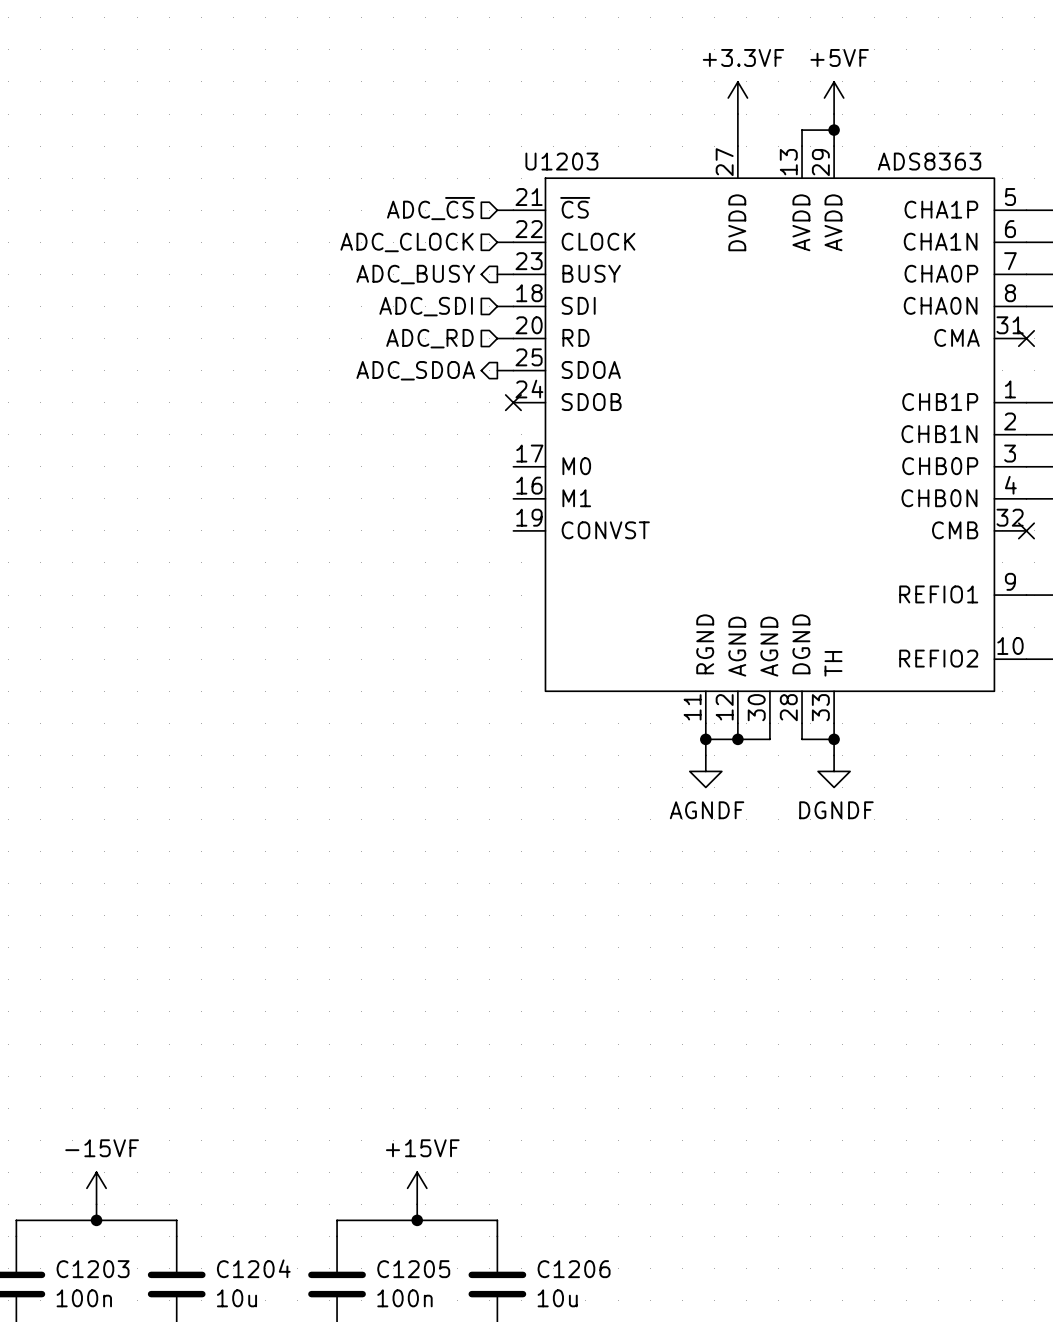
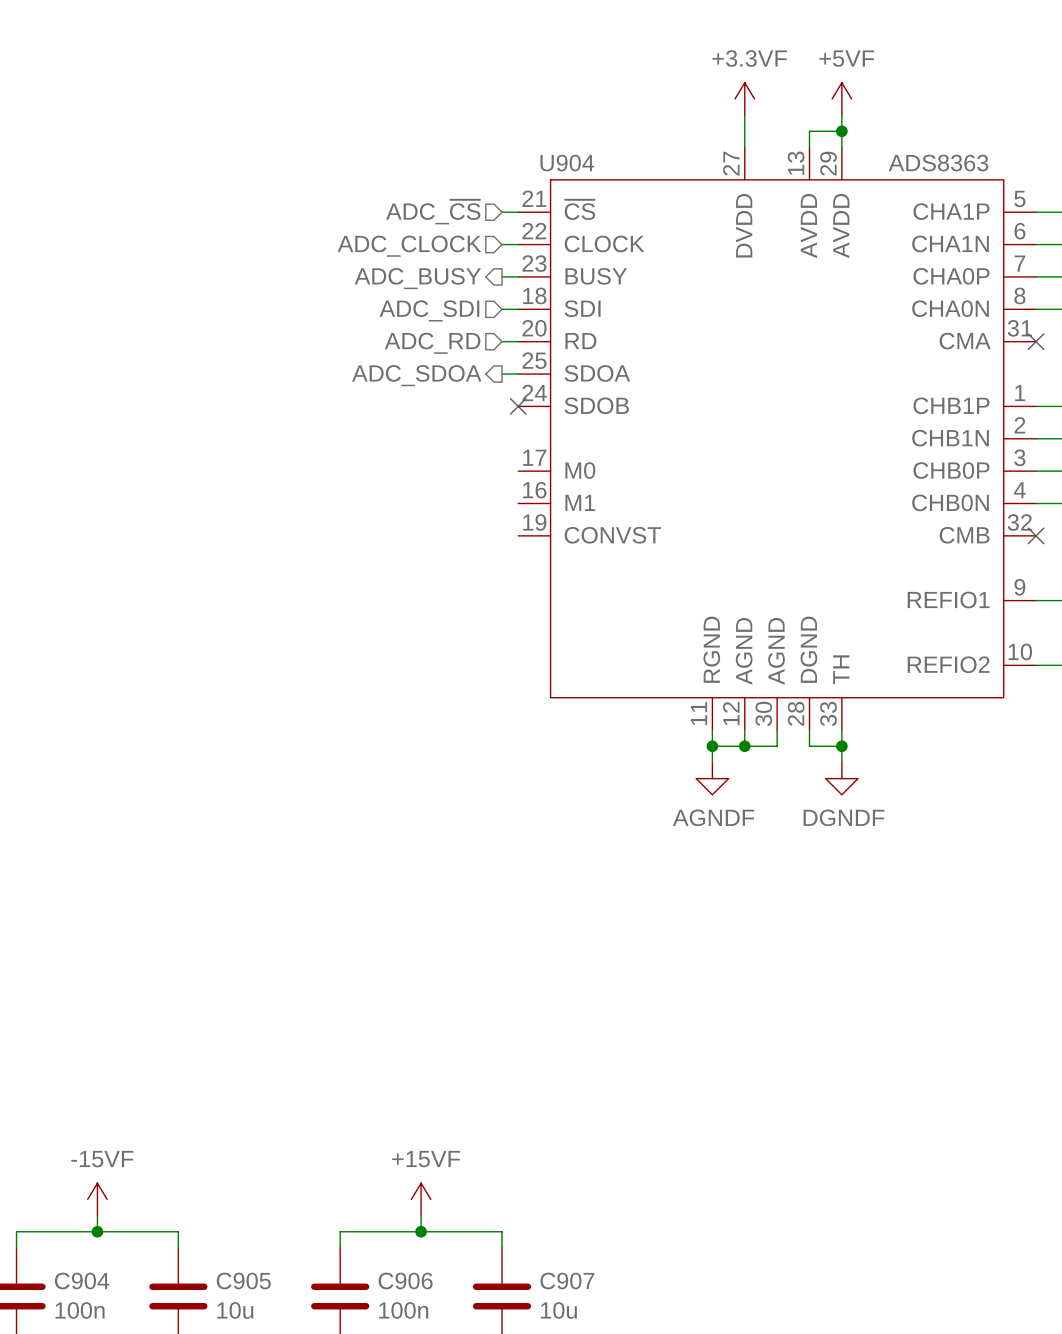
U1203 name: U1203 (561, 161) -> U904 (567, 163)
C1204 name: C1204 (253, 1268) -> C905 (243, 1281)
C1203 name: C1203 (93, 1269) -> C904 (82, 1281)
C1205 name: C1205 (413, 1269) -> C906 (405, 1281)
C1206 name: C1206 (574, 1269) -> C907 (567, 1281)

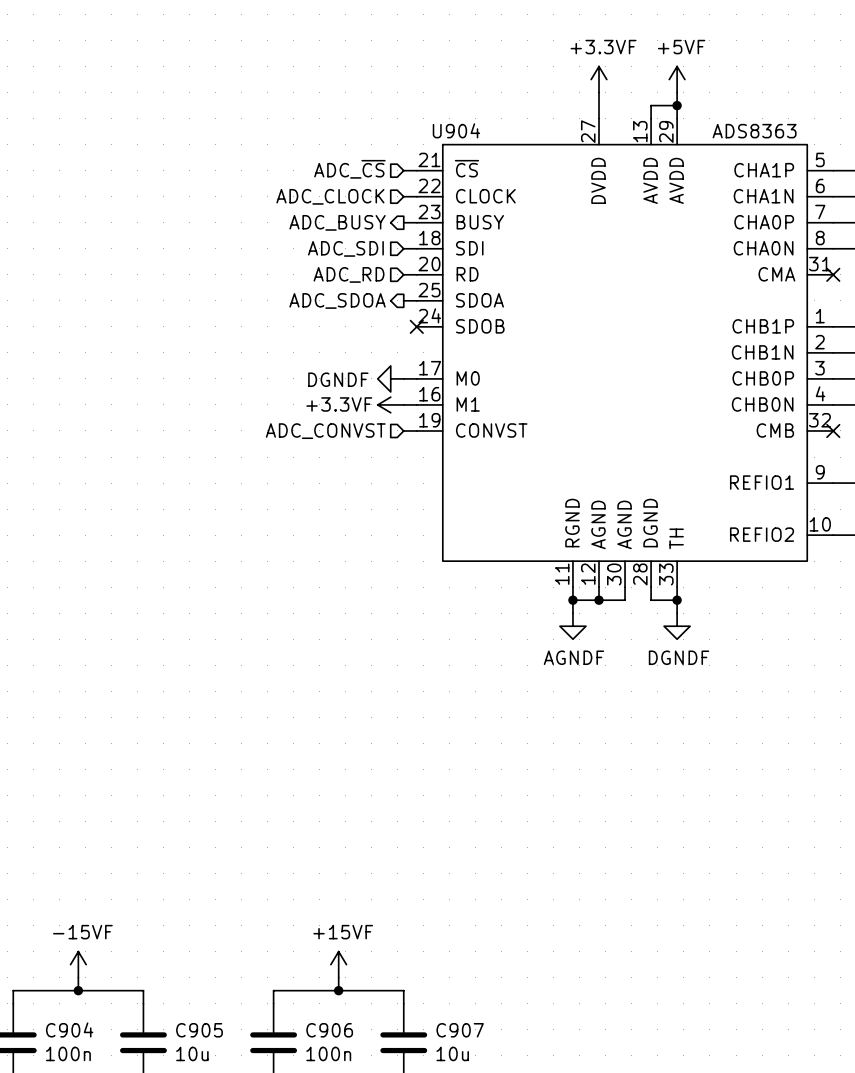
power symbol: none -> DGNDF (390, 378)
wire: none -> (403, 378) (416, 378)
power symbol: none -> +3.3VF (390, 404)
wire: none -> (403, 404) (416, 404)
wire: none -> (403, 430) (416, 430)
hierarchical label: none -> ADC_CONVST (325, 431)

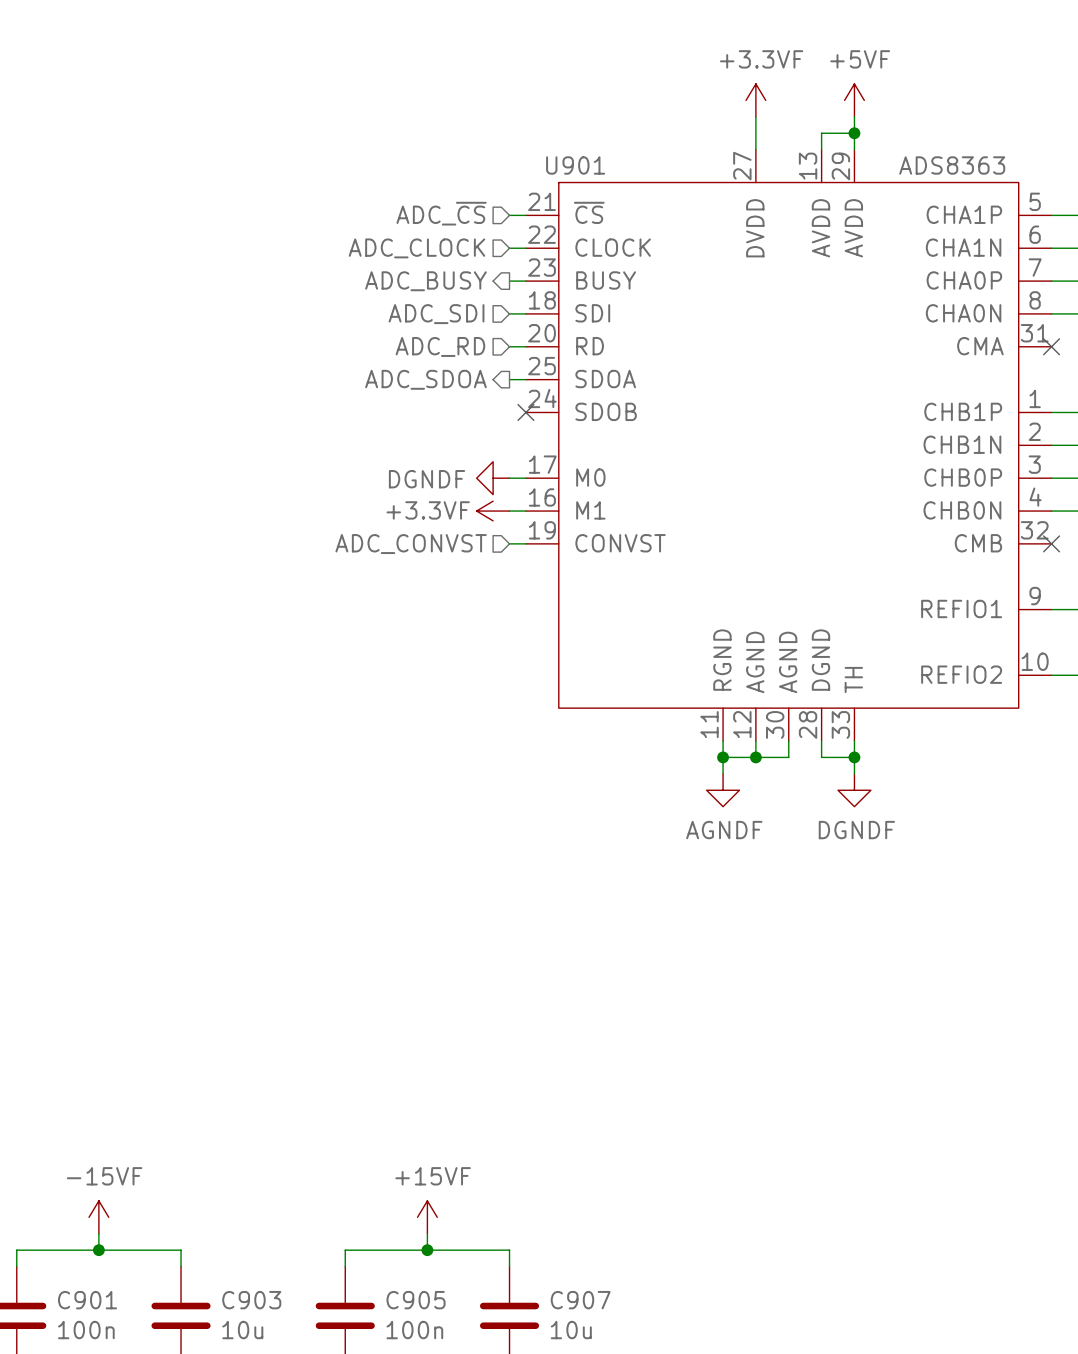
U904 name: U904 (456, 130) -> U901 (575, 165)
C904 name: C904 (69, 1029) -> C901 (87, 1300)
C905 name: C905 (199, 1030) -> C903 (251, 1300)
C906 name: C906 (329, 1030) -> C905 (416, 1300)

